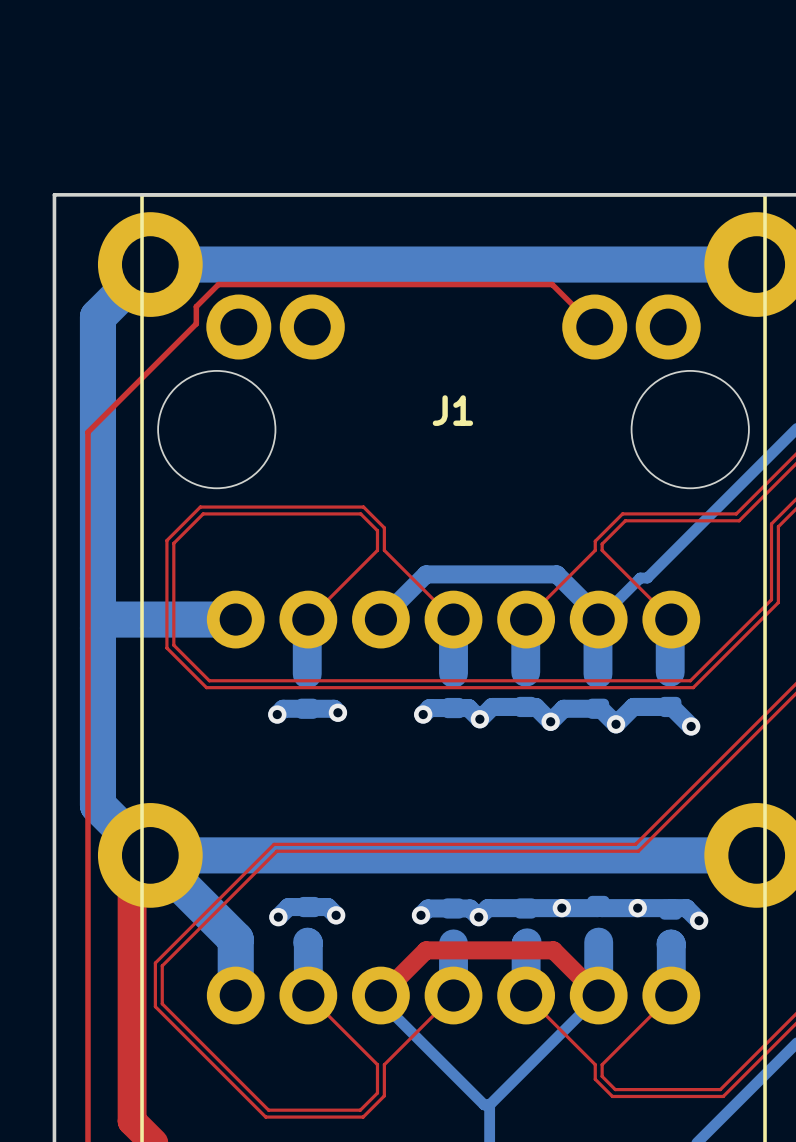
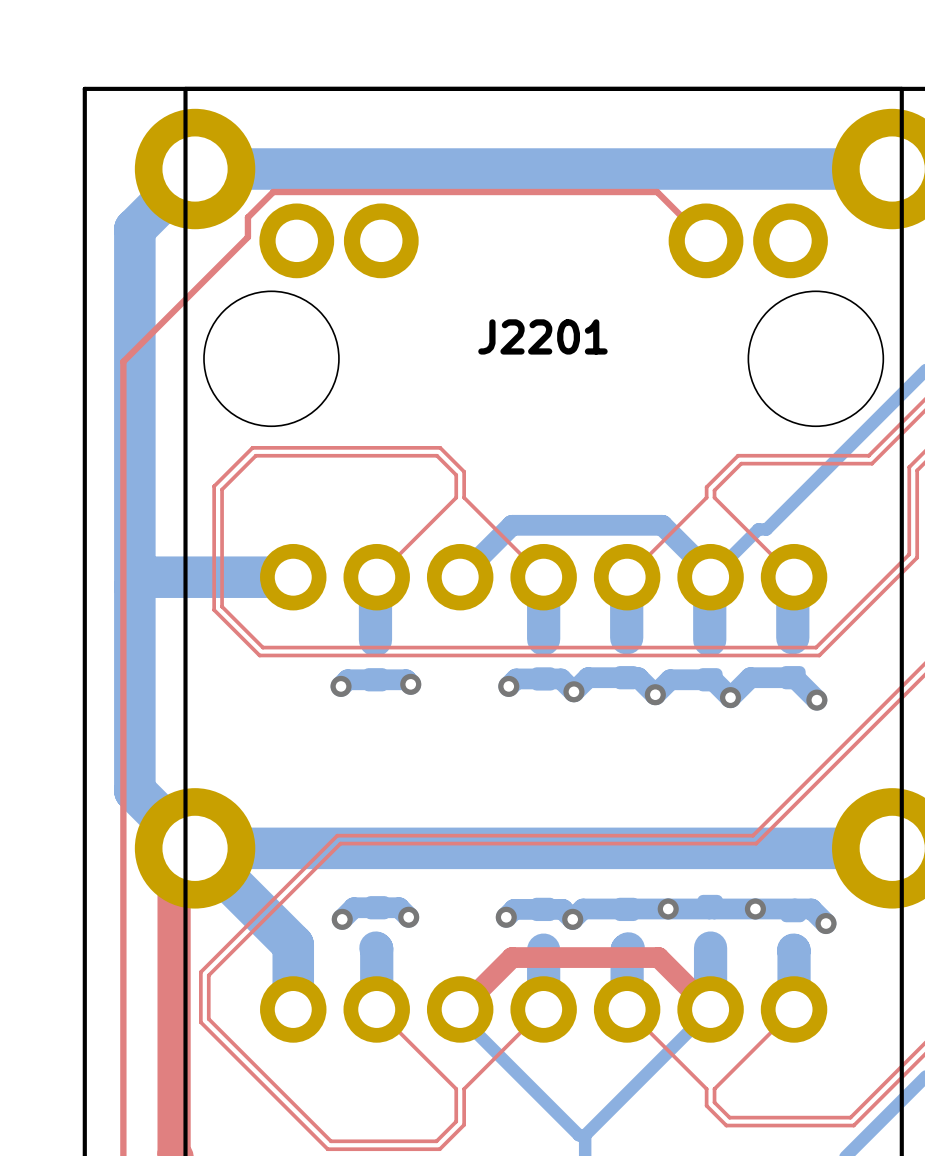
J1 name: J1 (452, 410) -> J2201 (542, 336)

